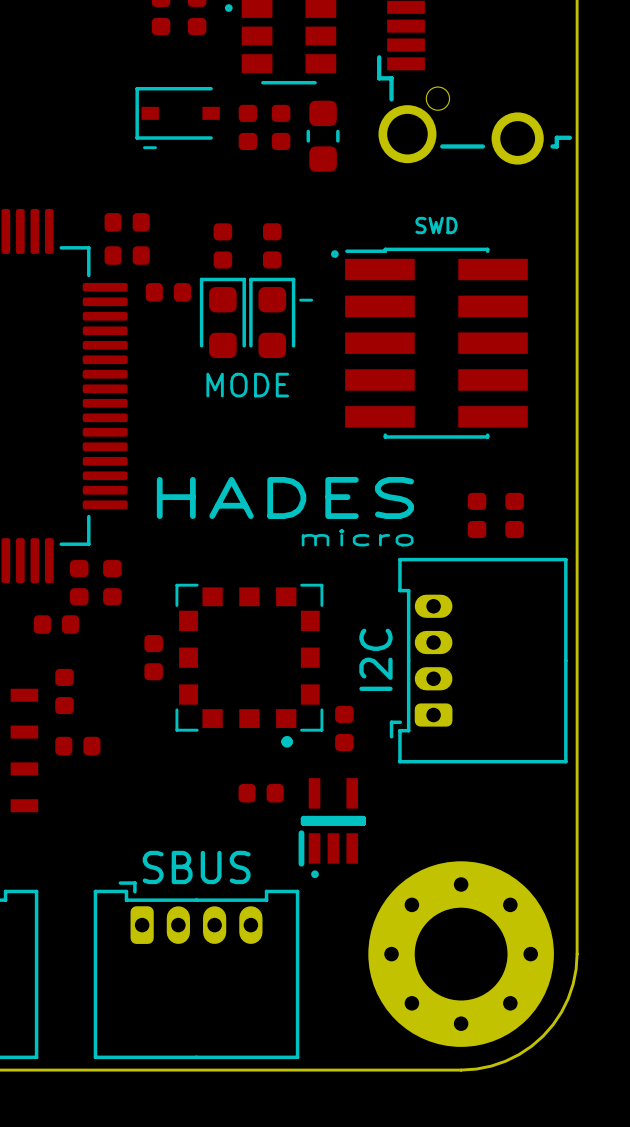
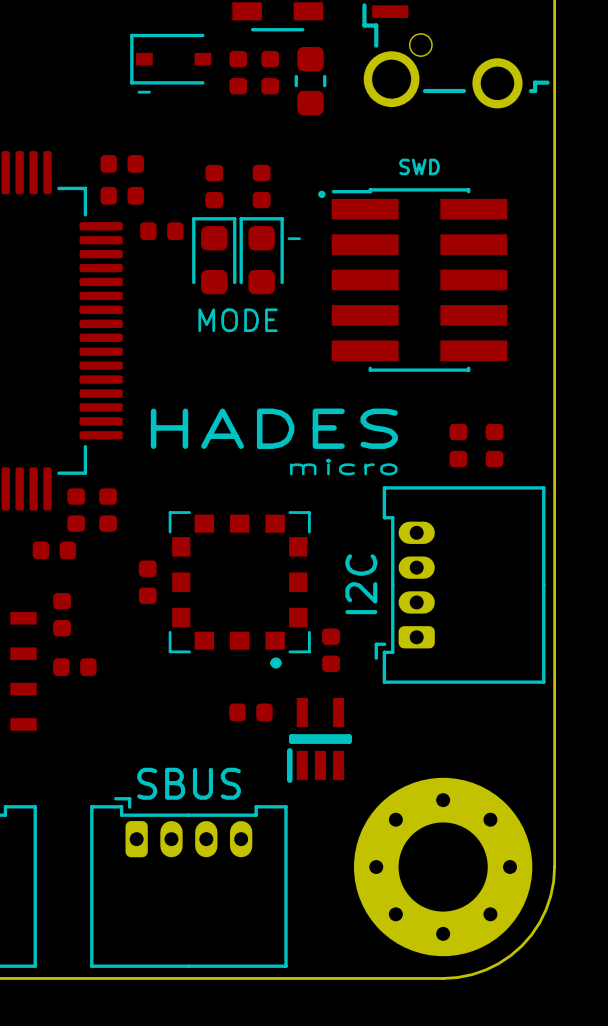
drawing: [311, 870, 319, 879] -> none

